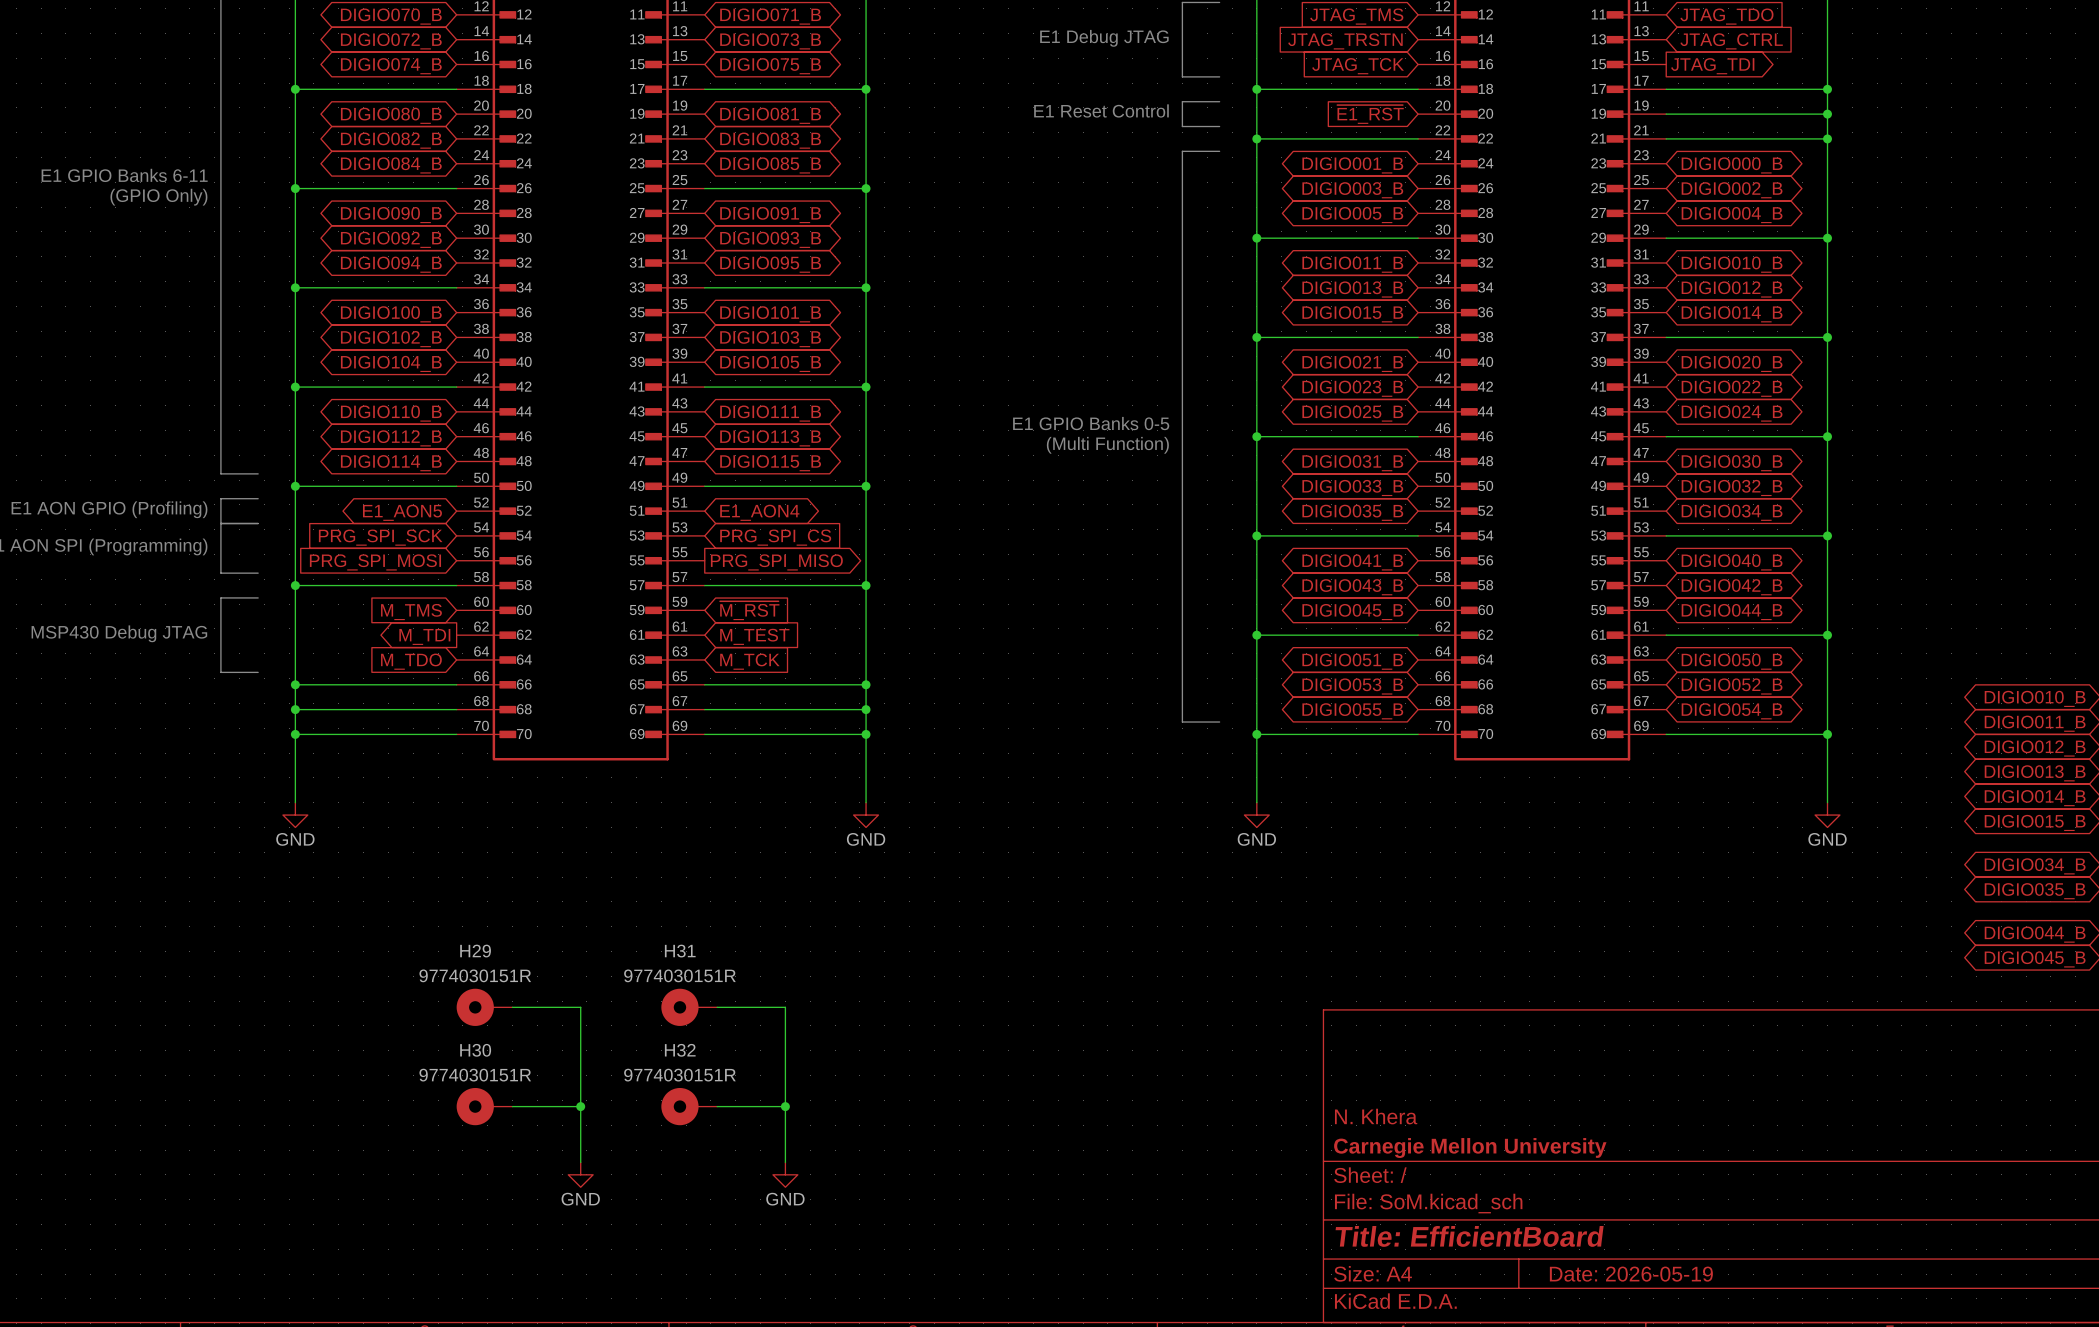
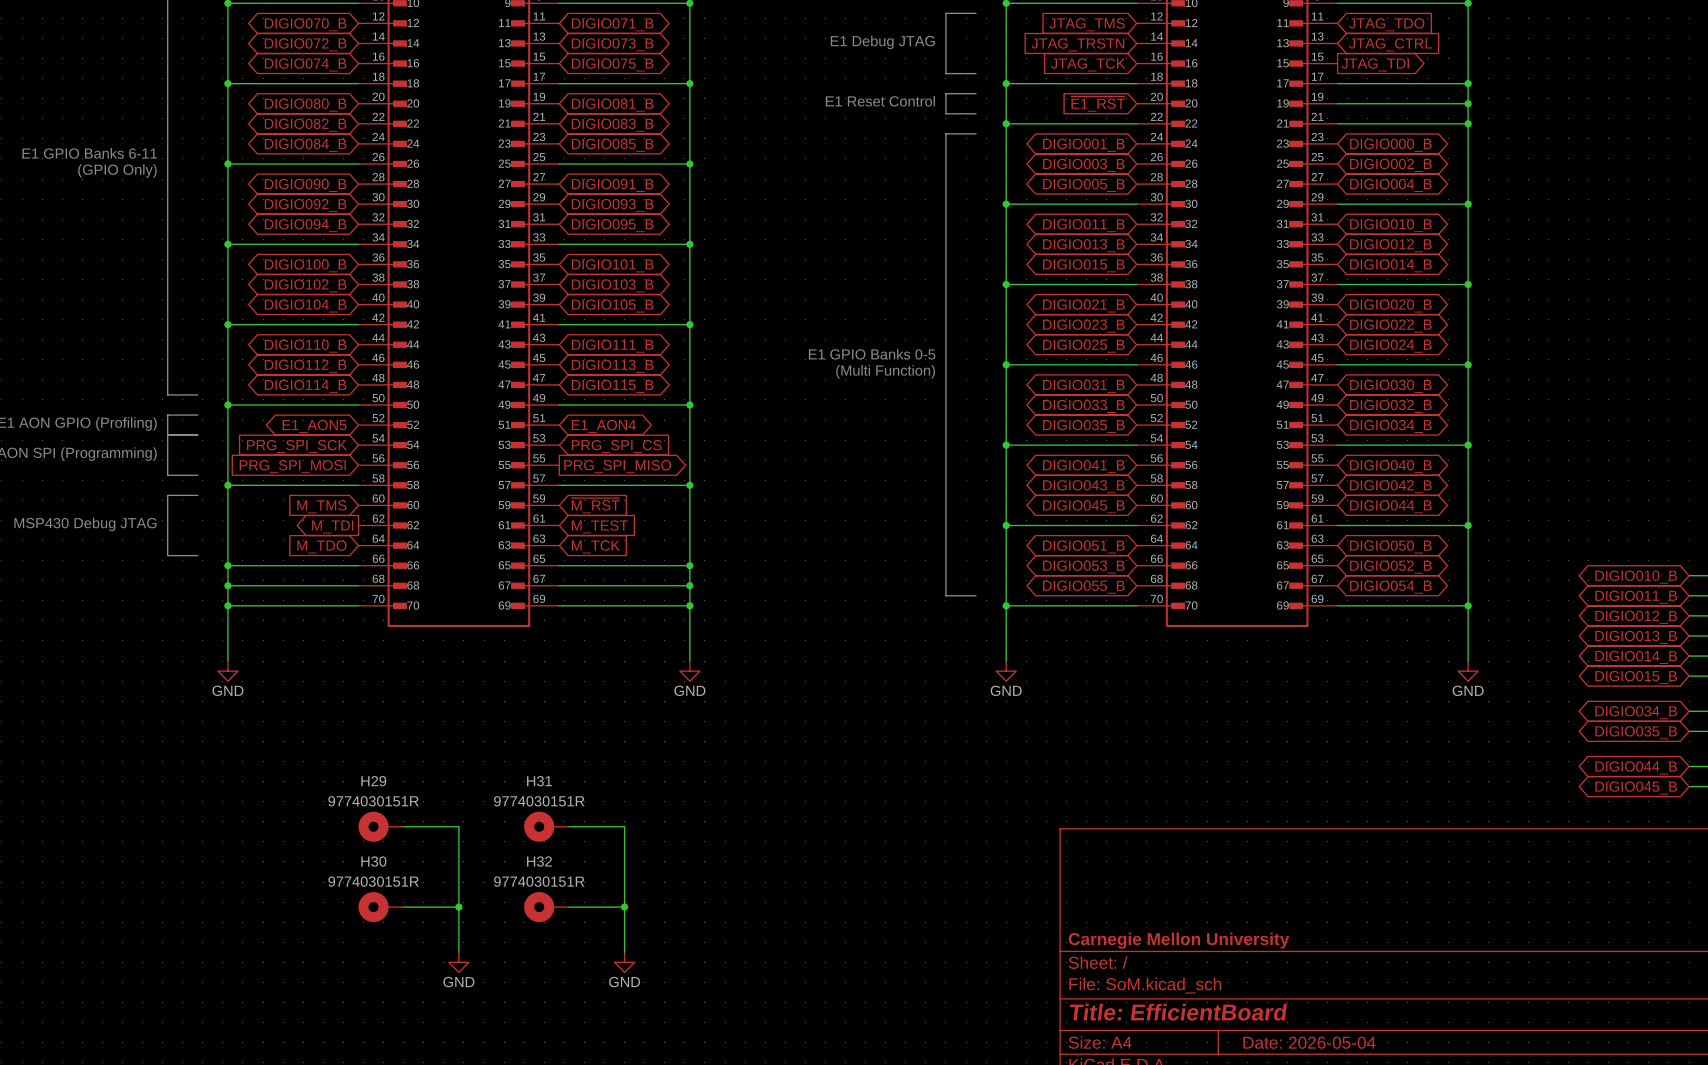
title block: N. Khera (1376, 1116) -> none
title block: Date: 2026-05-19 (1631, 1274) -> Date: 2026-05-04 (1309, 1042)

